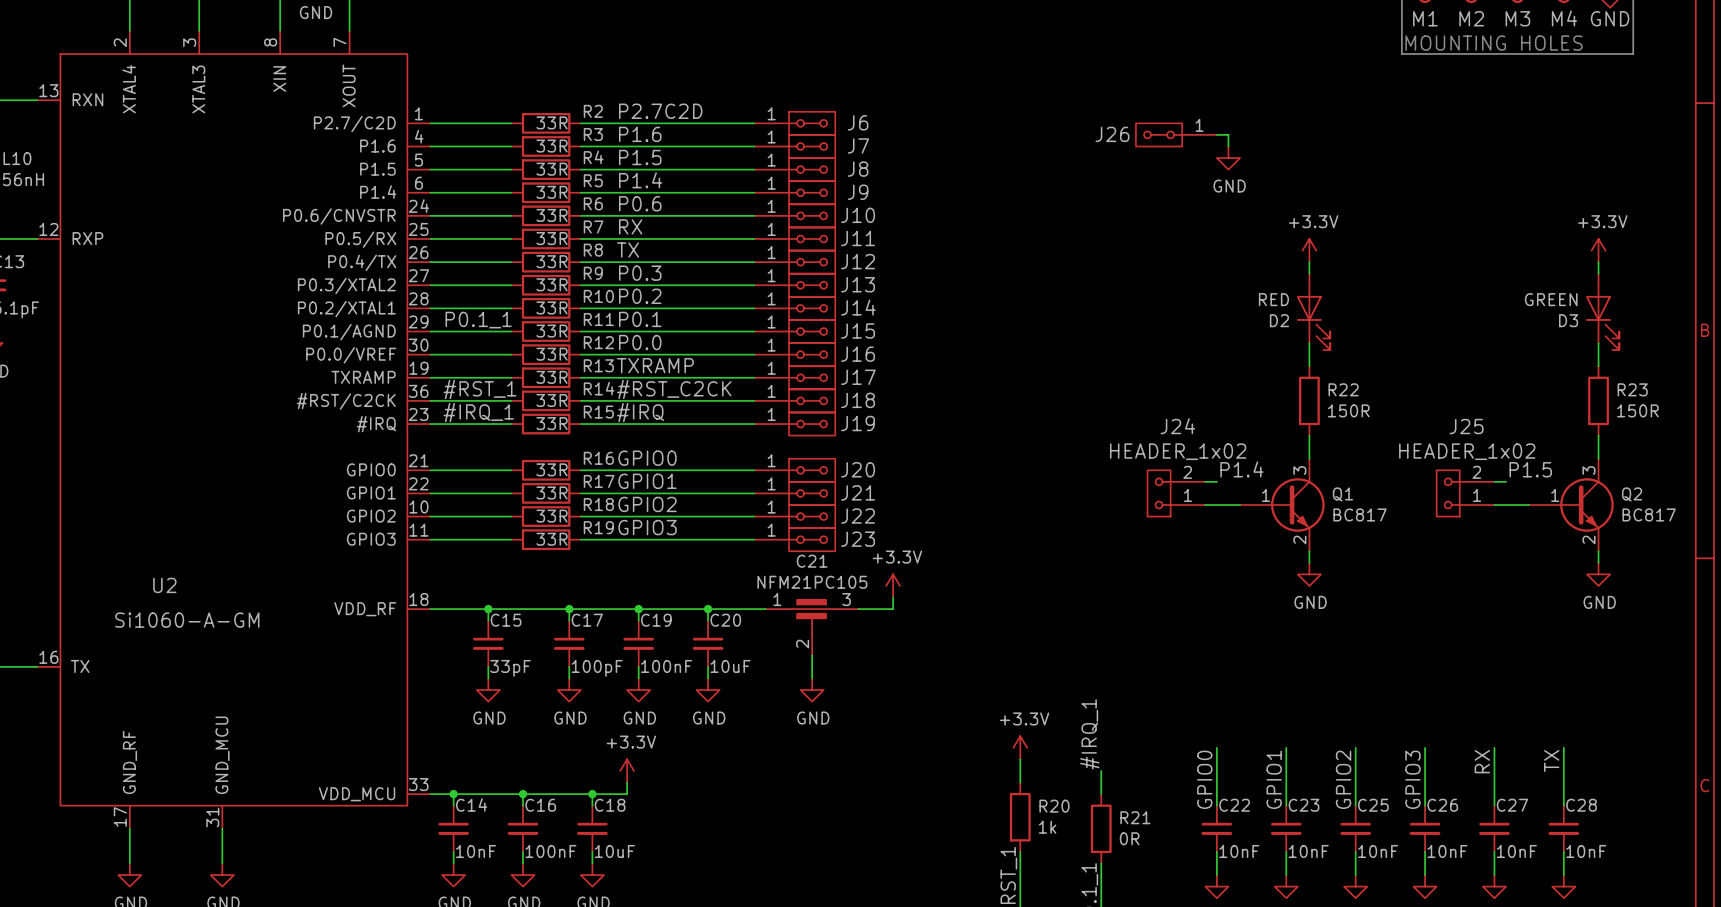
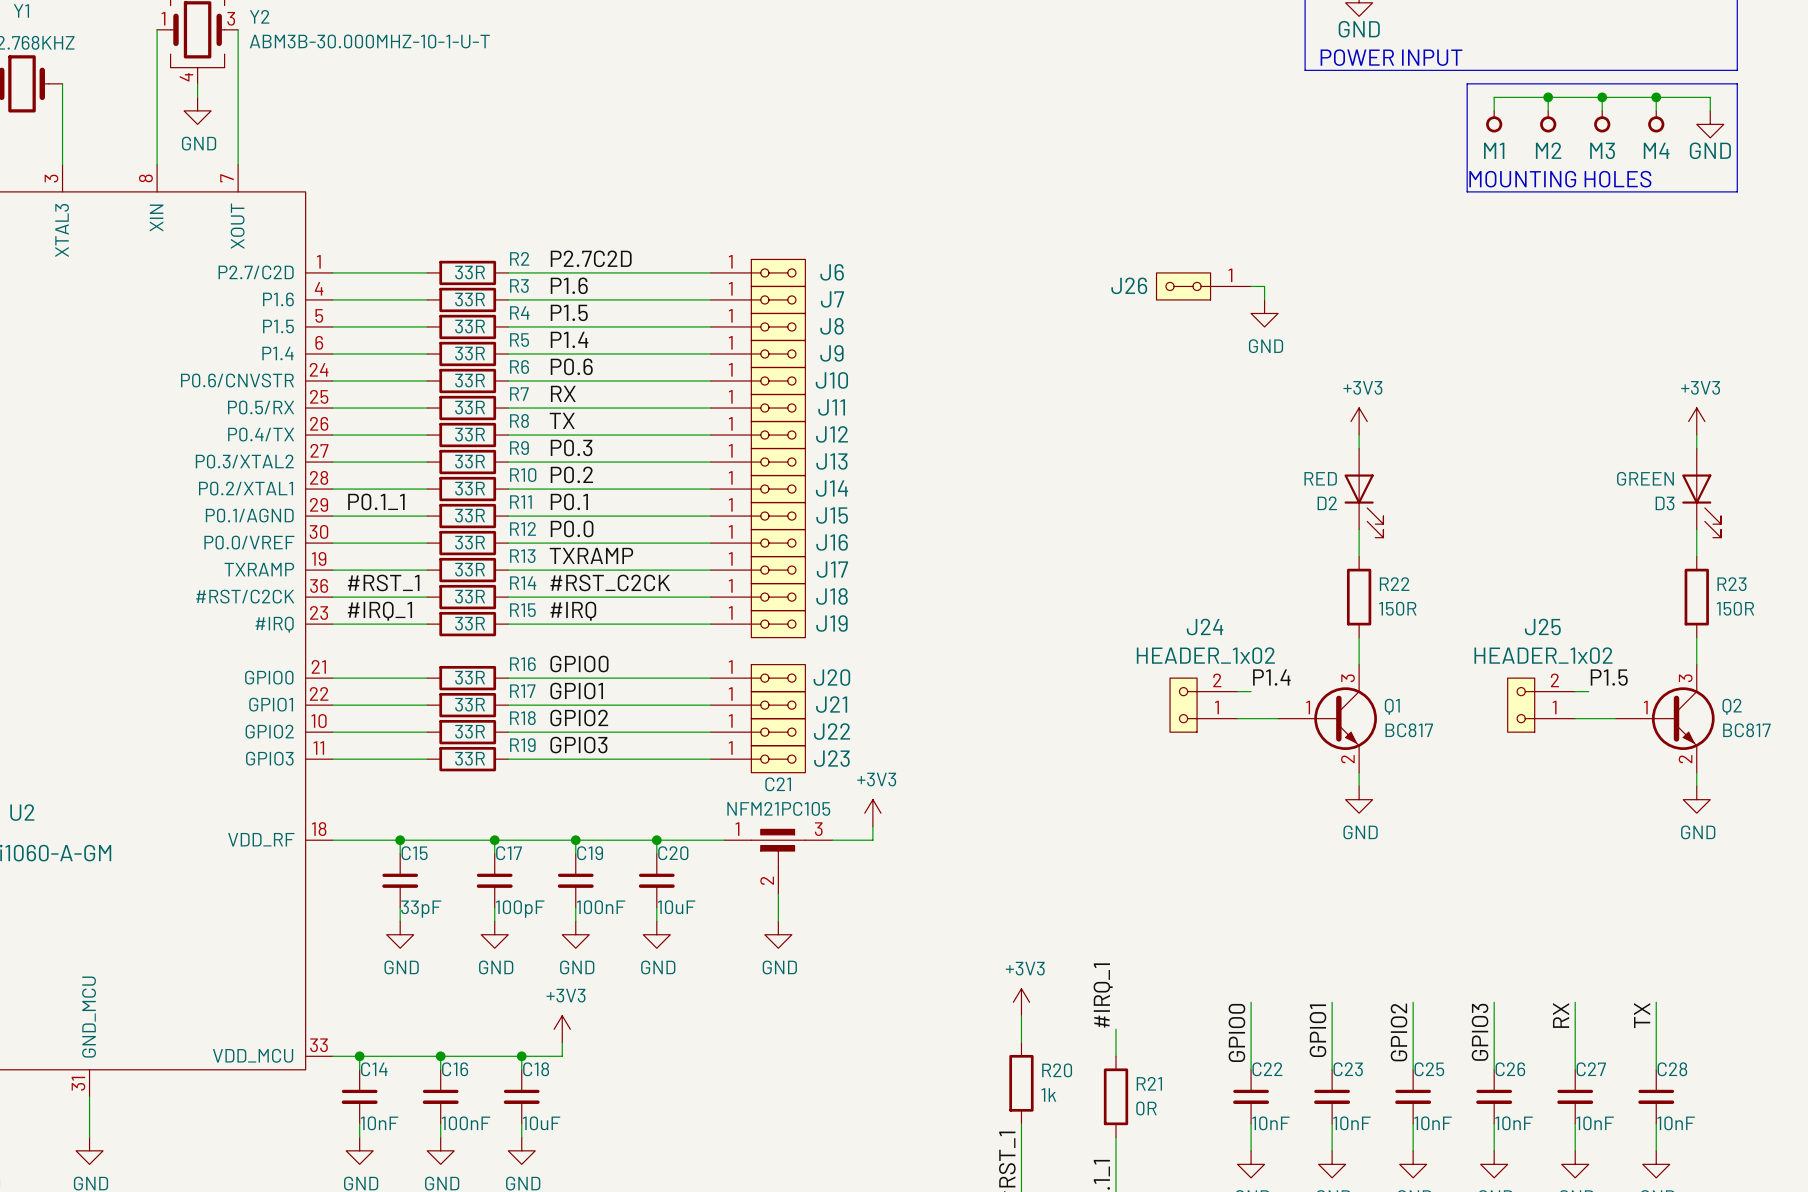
power symbol: +3.3V (1309, 250) -> +3V3 (1359, 421)
power symbol: +3.3V (1598, 250) -> +3V3 (1696, 421)
power symbol: +3.3V (893, 585) -> +3V3 (872, 813)
power symbol: +3.3V (1020, 747) -> +3V3 (1021, 1002)
power symbol: +3.3V (627, 770) -> +3V3 (562, 1029)

